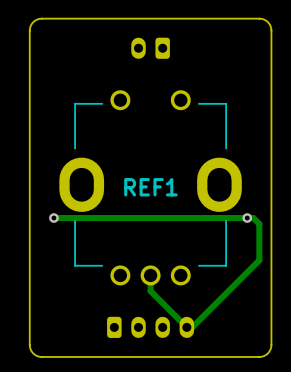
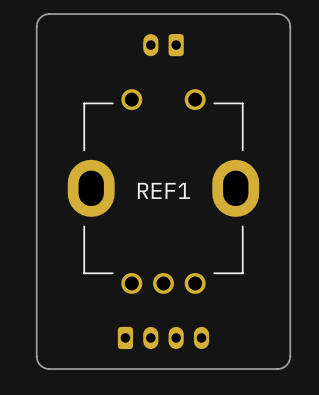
track: (53, 218) (253, 218) (259, 224) (259, 260) (192, 327) (186, 327) (150, 291) (150, 275) -> none
via: (53, 218) -> none
via: (247, 218) -> none

